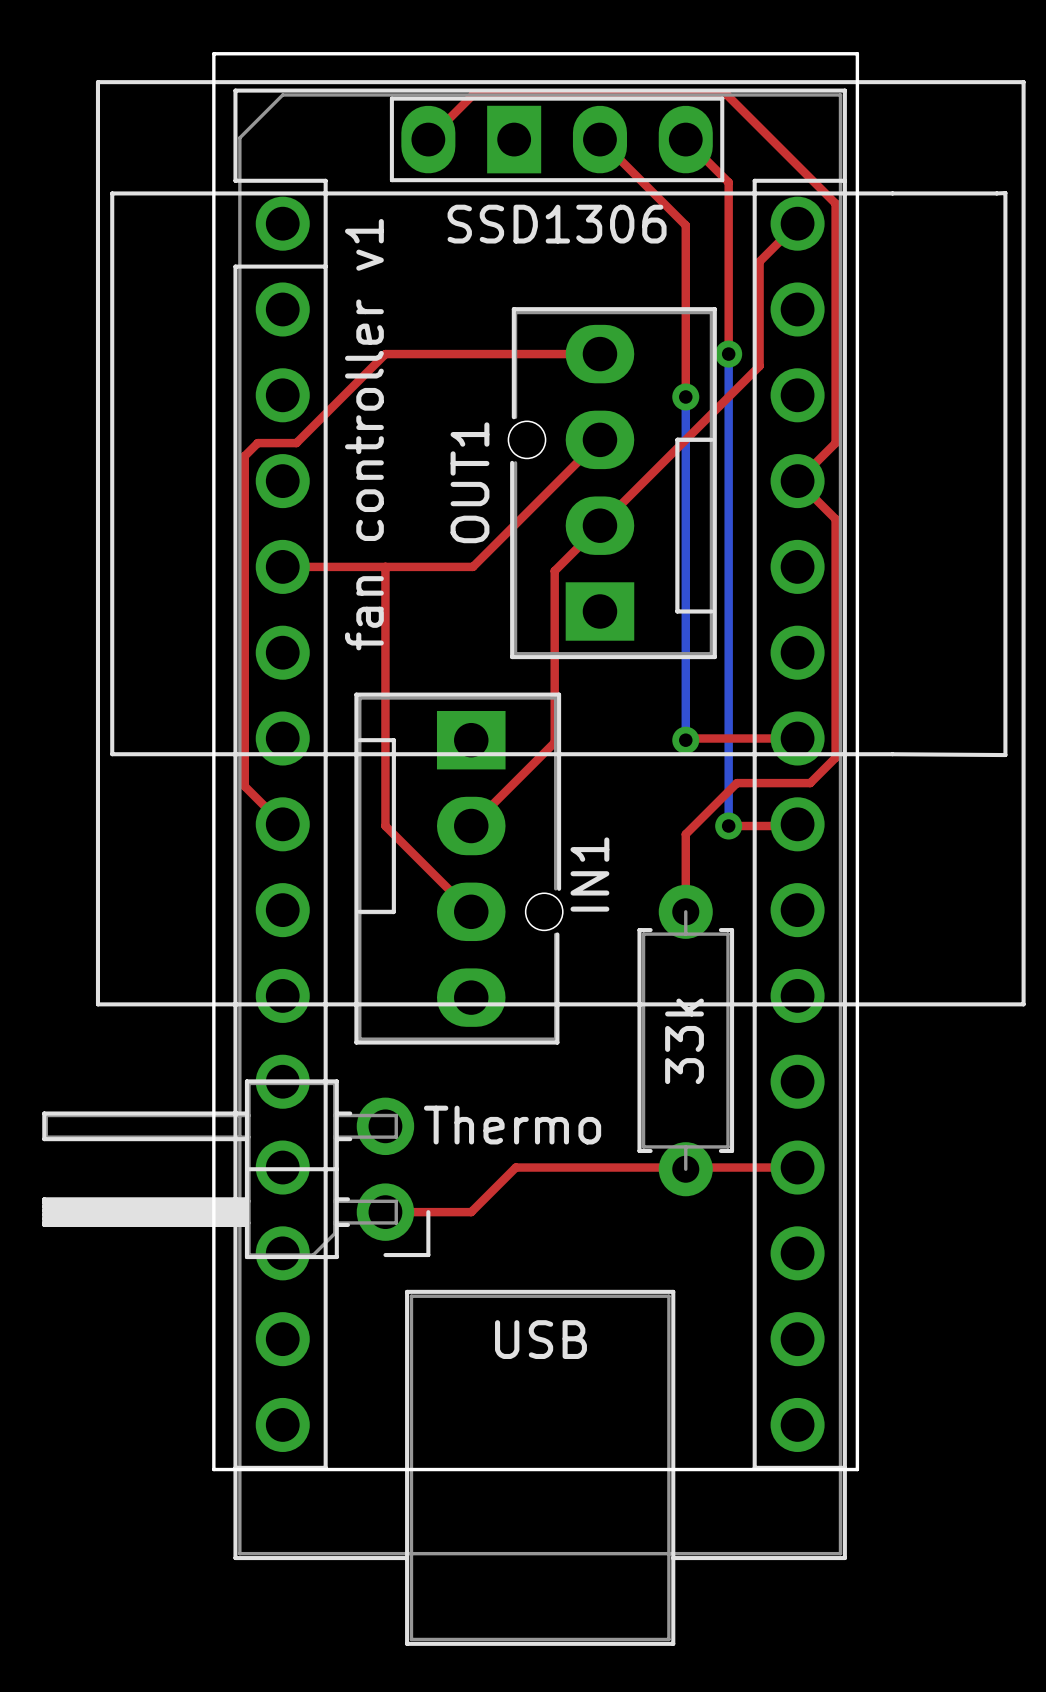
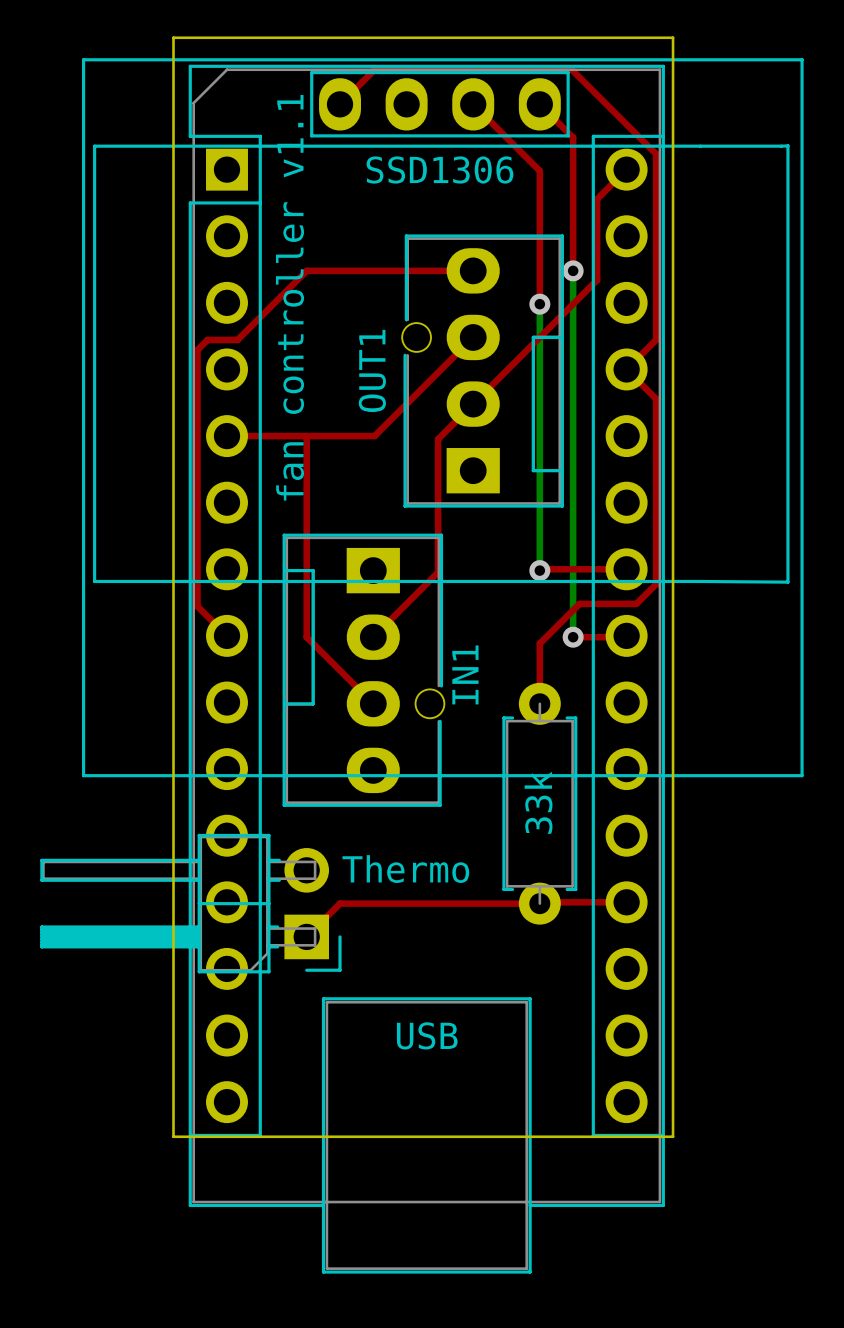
part footprint: [95, 80, 1026, 1007] -> [81, 58, 804, 778]
part footprint: [233, 88, 847, 1646] -> [188, 64, 665, 1274]
text: fan controller v1 (364, 434) -> fan controller v1.1 (289, 297)
part footprint: [42, 1079, 431, 1260] -> [40, 833, 342, 974]
top track: (687, 1167) (515, 1167) (471, 1212) (385, 1212) -> (541, 902) (340, 903) (306, 936)

